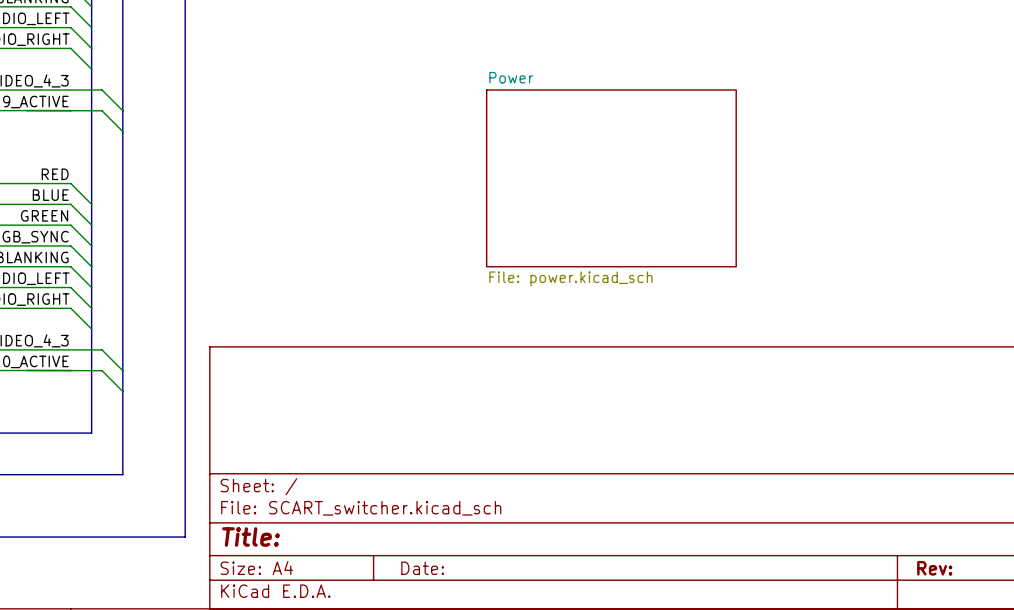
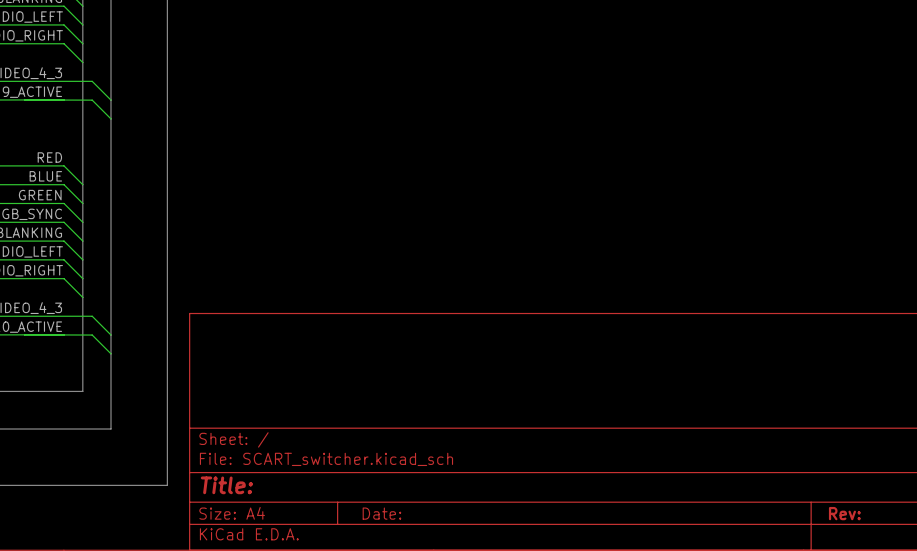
sheet Power: File: power.kicad_sch (611, 178) -> none

